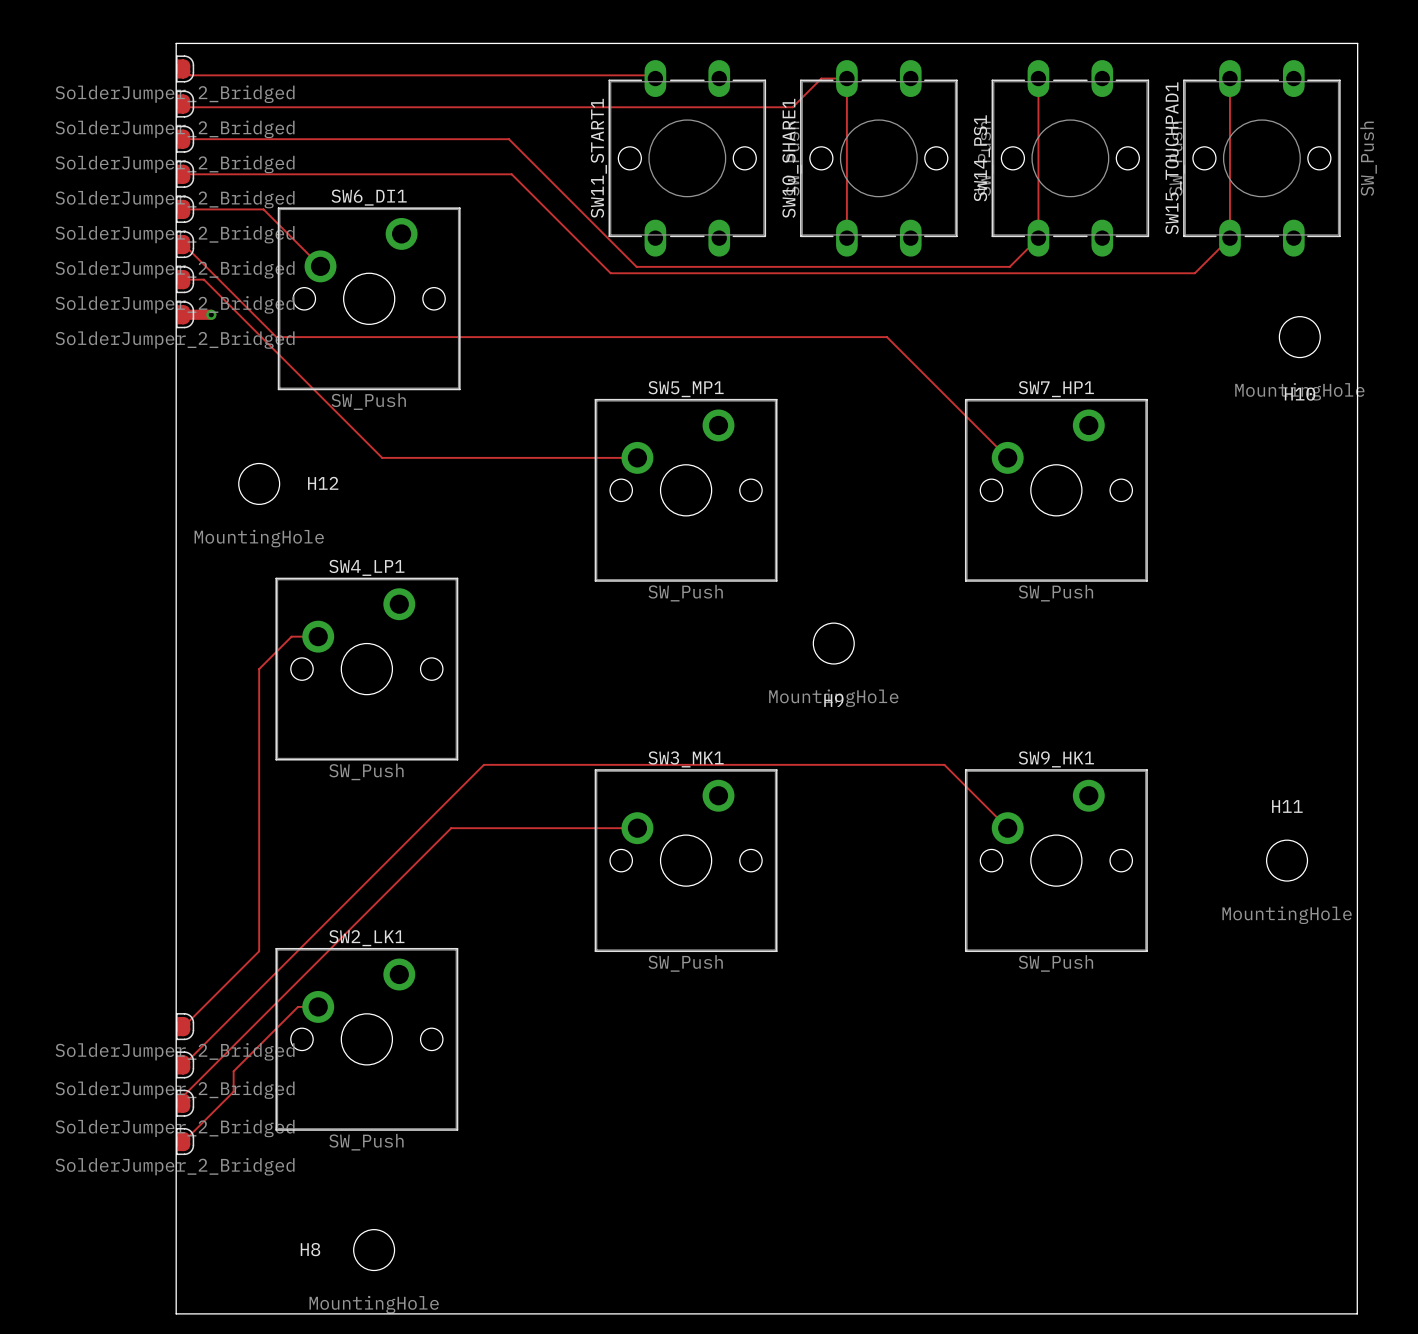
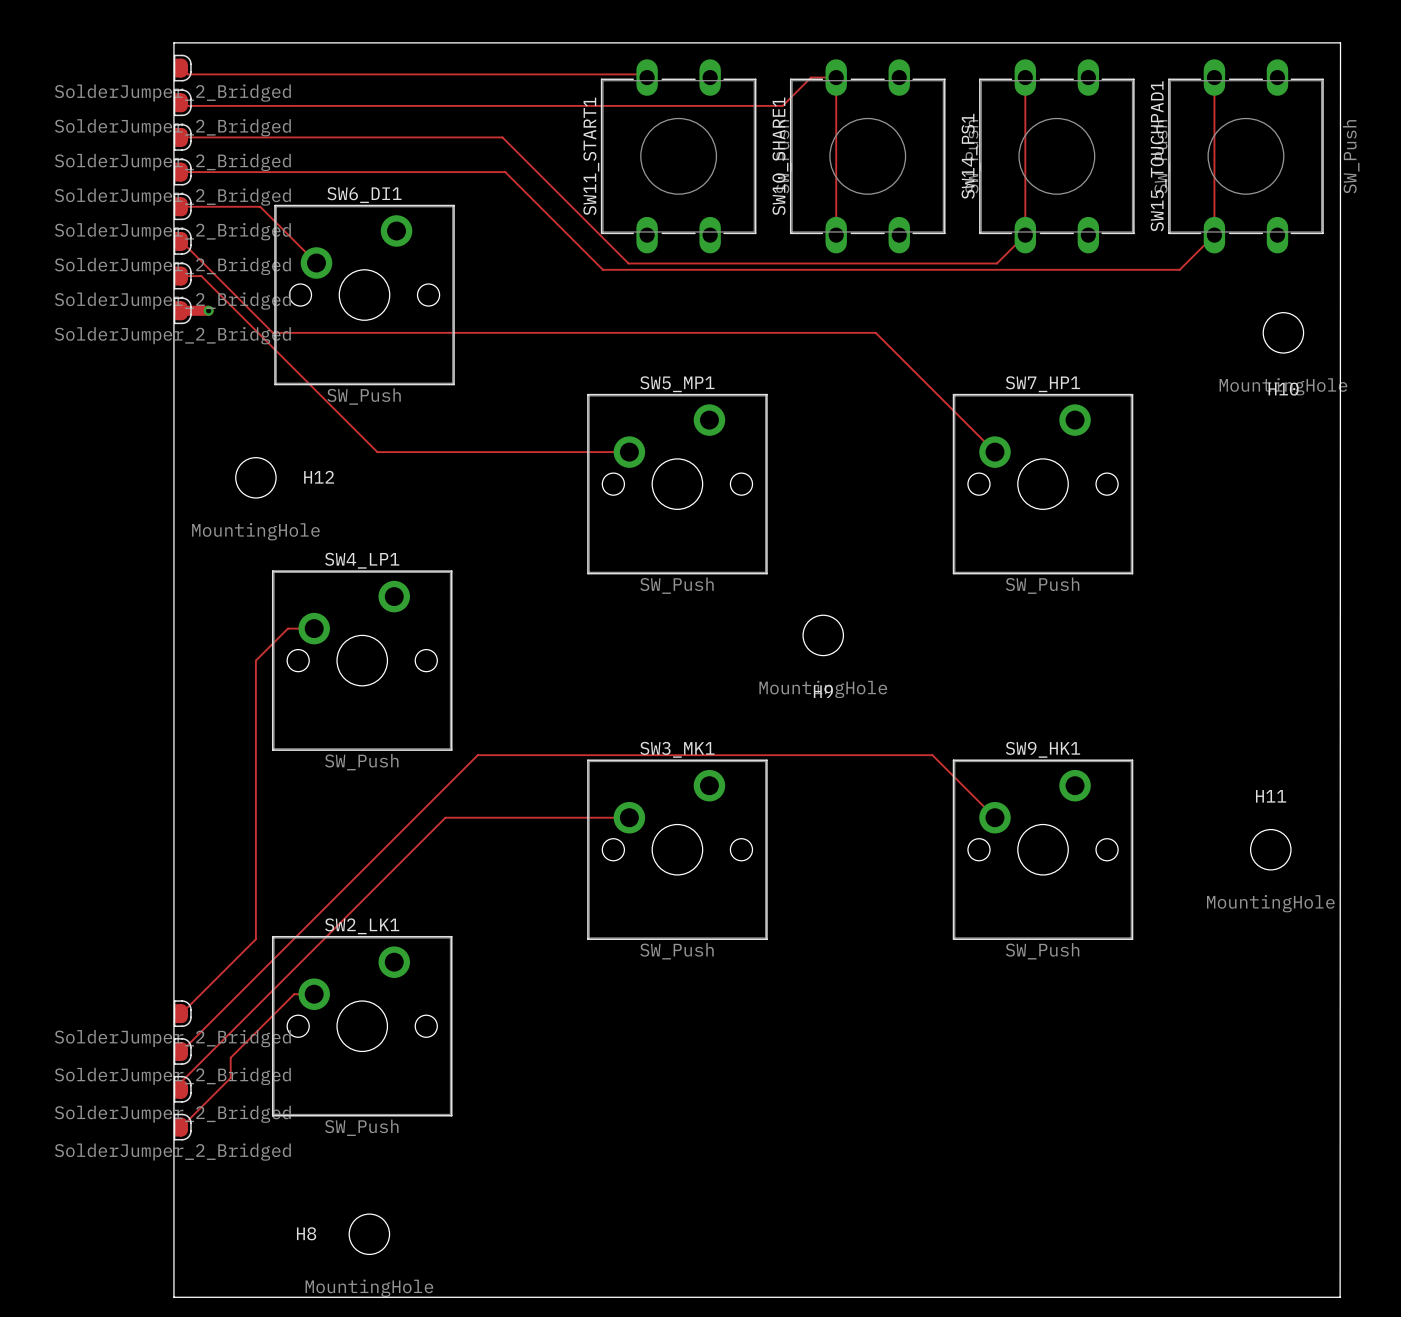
SW11_START1 footprint: [608, 60, 767, 257] -> [600, 59, 757, 254]
SW10_SHARE1 footprint: [800, 60, 958, 257] -> [789, 59, 946, 254]
SW14_PS1 footprint: [991, 60, 1150, 257] -> [979, 59, 1135, 254]
SW15_TOUCHPAD1 footprint: [1183, 60, 1341, 257] -> [1168, 59, 1324, 254]

